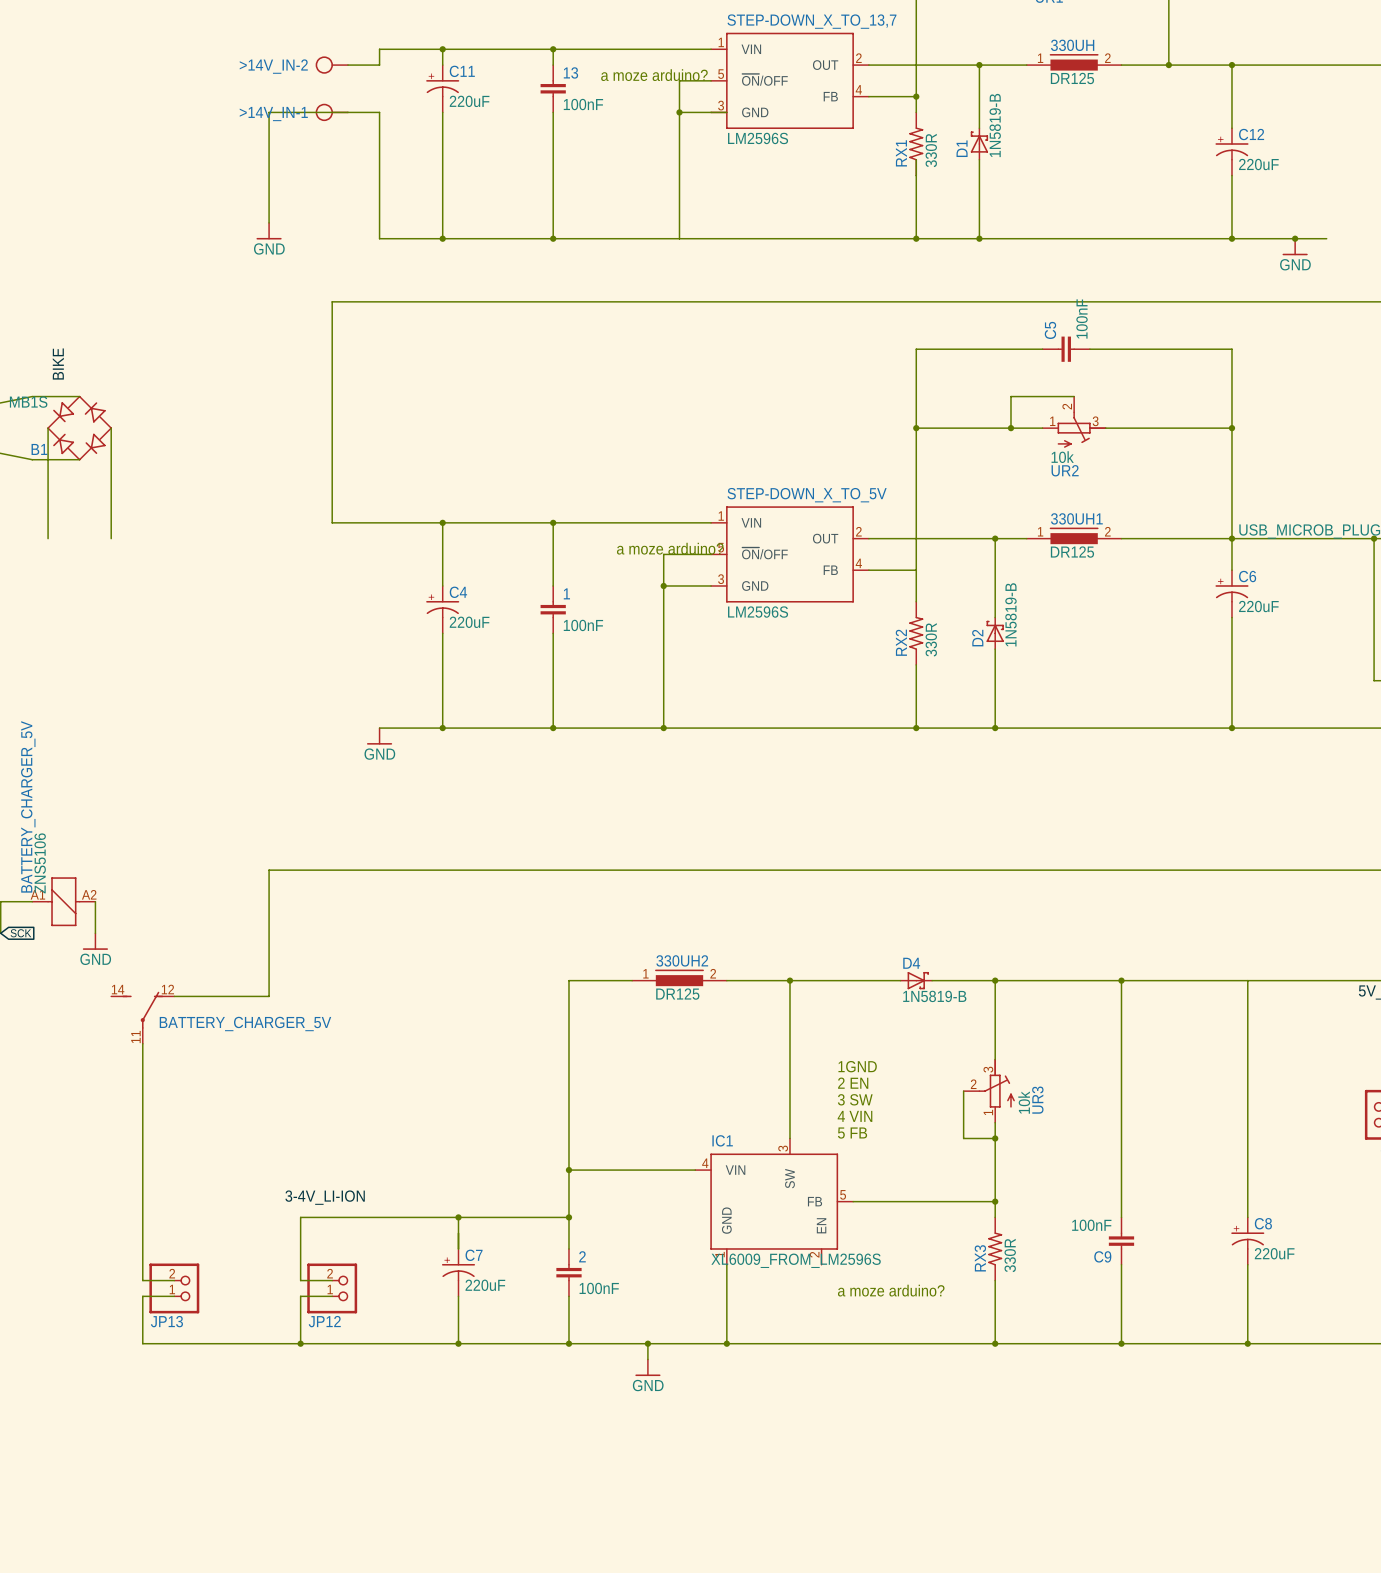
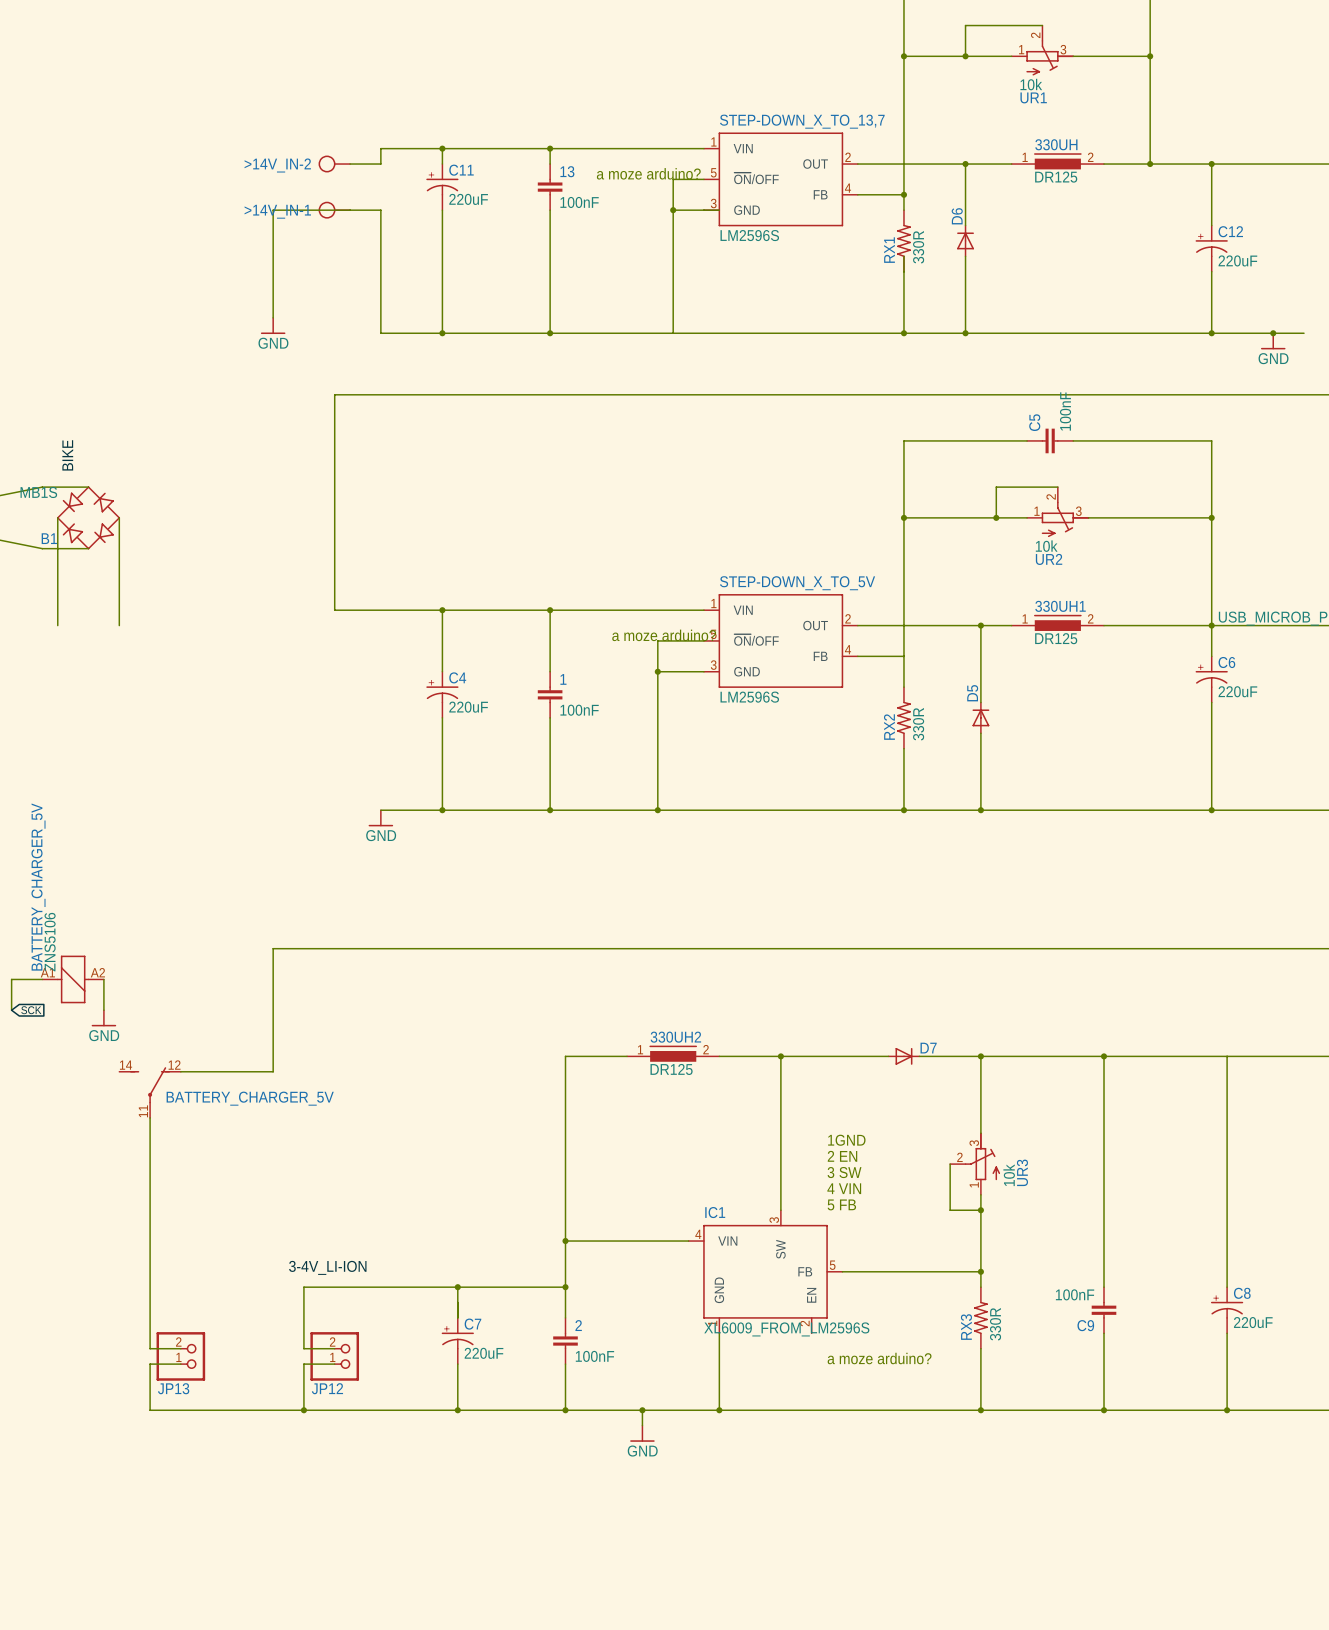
D1: 1N5819-B (979, 143) -> none
D6: none -> (965, 240)
D2: 1N5819-B (995, 633) -> none
D5: none -> (980, 717)
D4: 1N5819-B (916, 980) -> none
D7: none -> (903, 1056)

